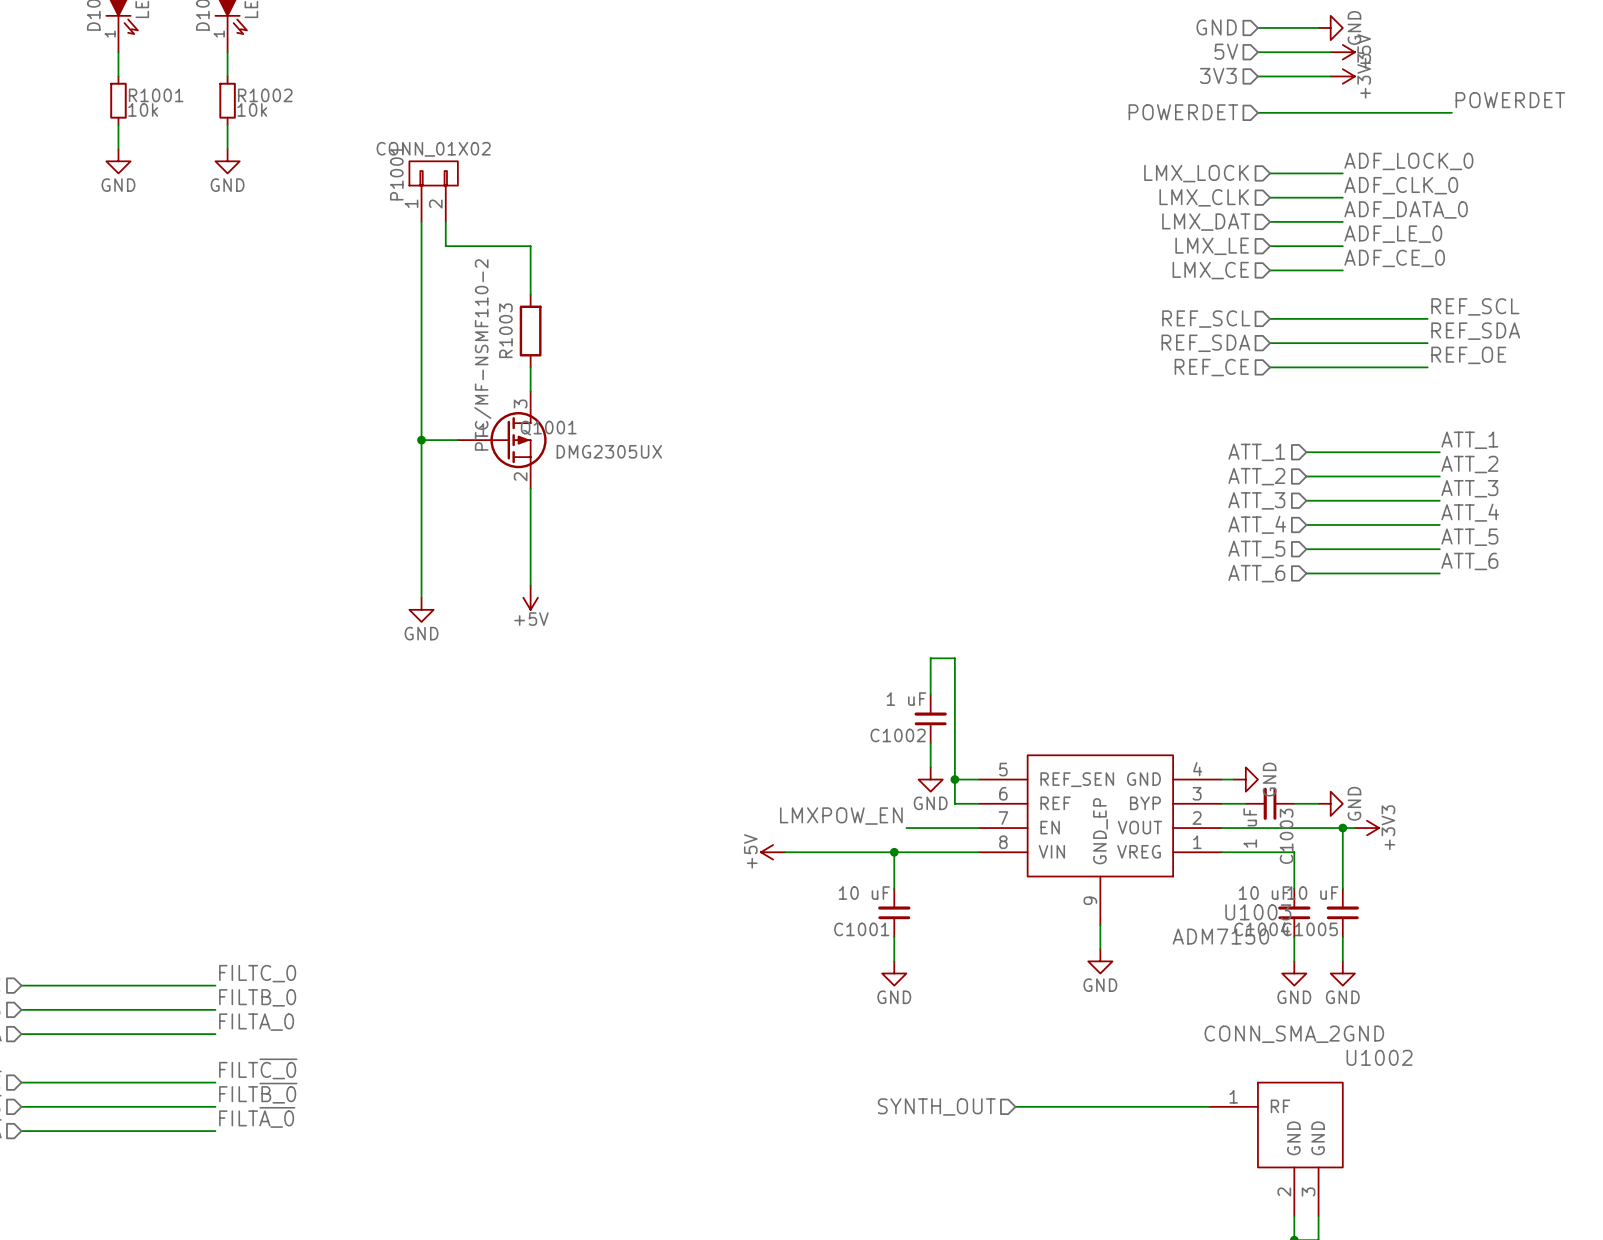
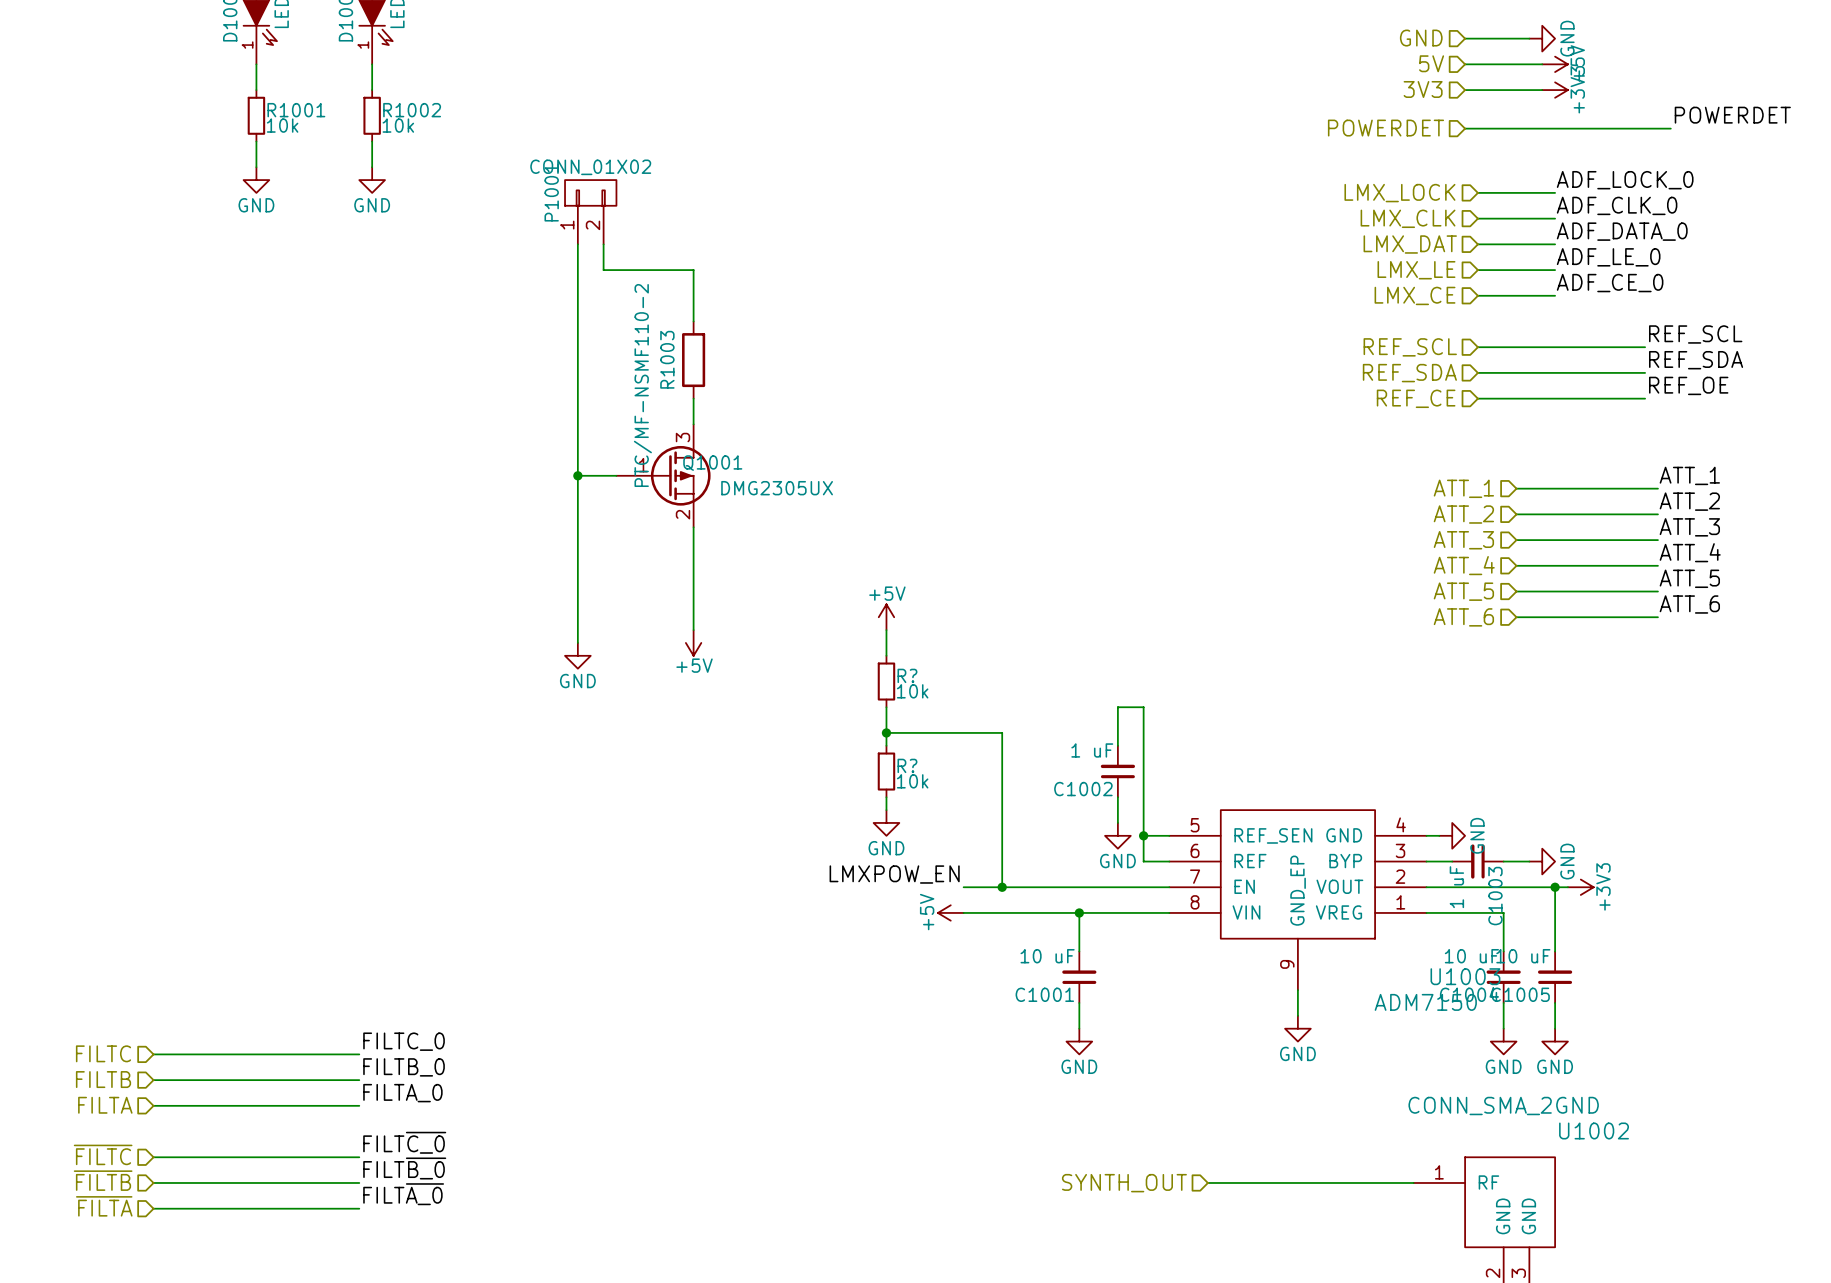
power symbol: none -> +5V (886, 617)
wire: none -> (886, 630) (886, 655)
R?: none -> 10k (886, 681)
wire: none -> (886, 707) (886, 745)
wire: none -> (886, 732) (1002, 732) (1002, 887)
junction: none -> (886, 732)
R?: none -> 10k (886, 771)
wire: none -> (886, 797) (886, 810)
power symbol: none -> GND (886, 822)
label position: LMXPOW_EN (841, 816) -> LMXPOW_EN (894, 874)
wire: none -> (963, 887) (1092, 887)
junction: none -> (1002, 887)

